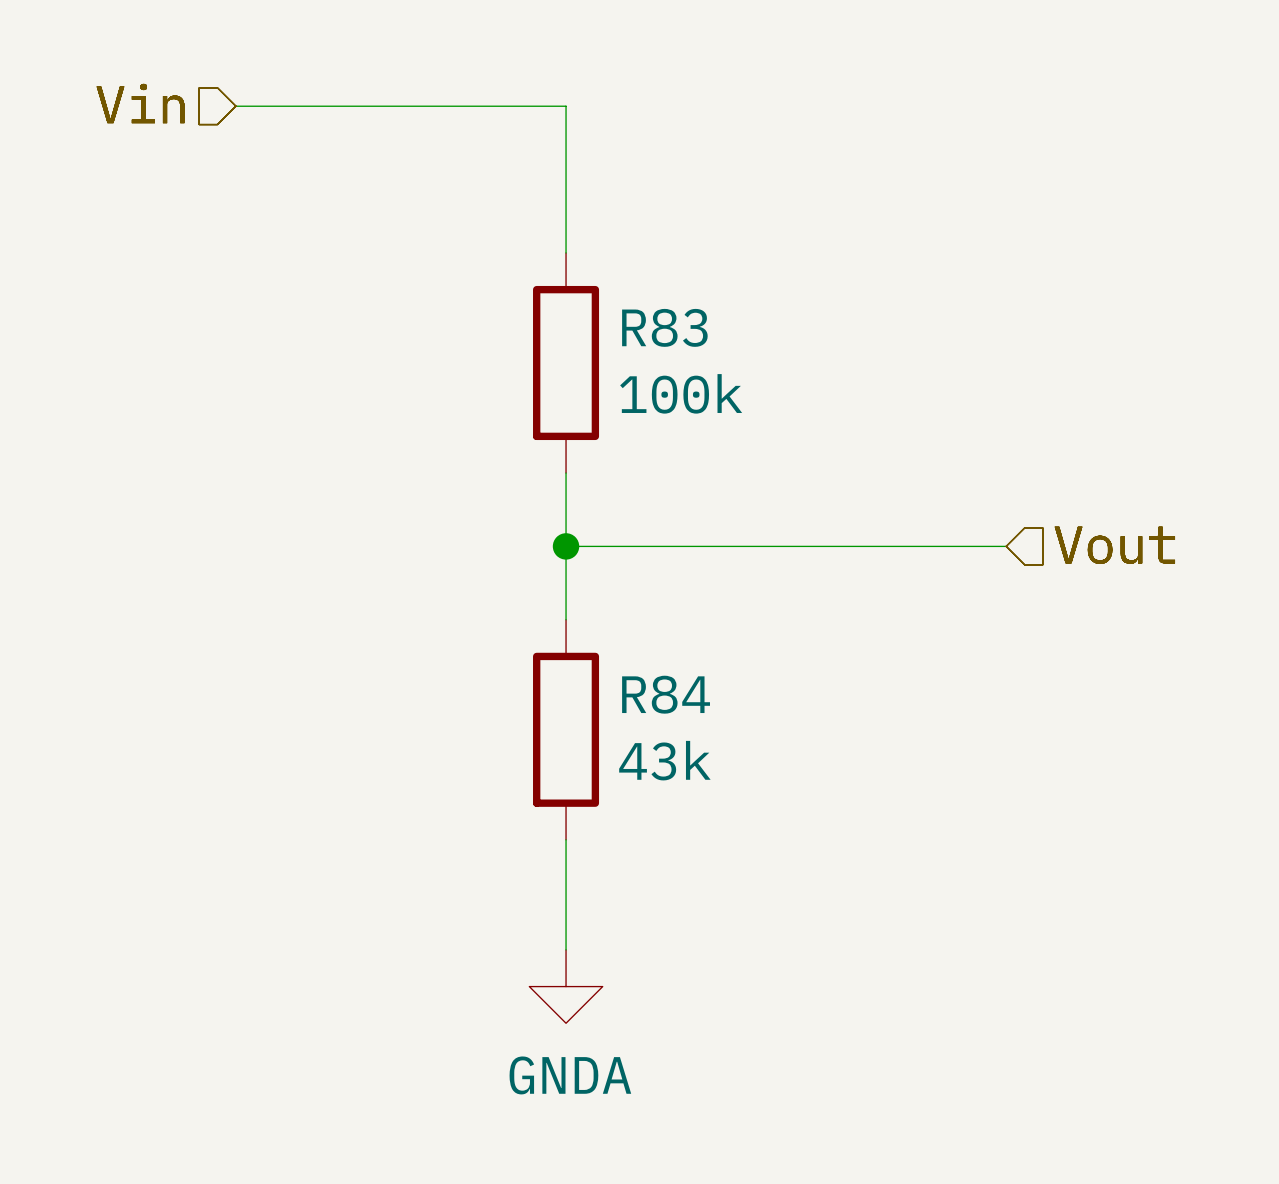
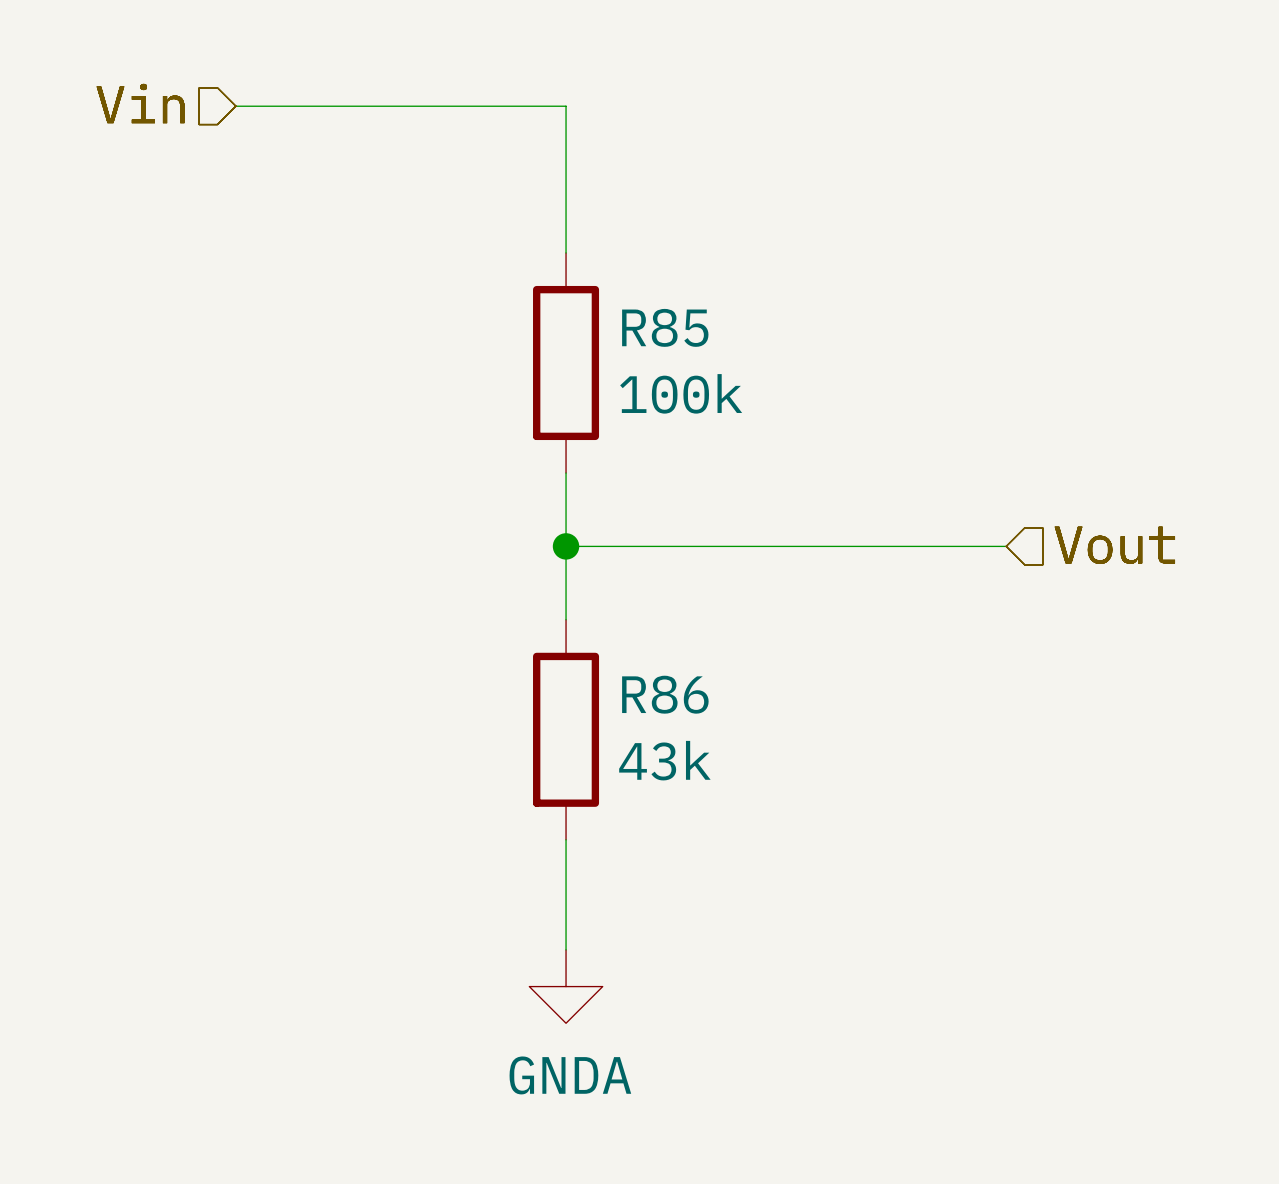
R83 name: R83 (664, 327) -> R85 (665, 327)
R84 name: R84 (666, 694) -> R86 (665, 694)

